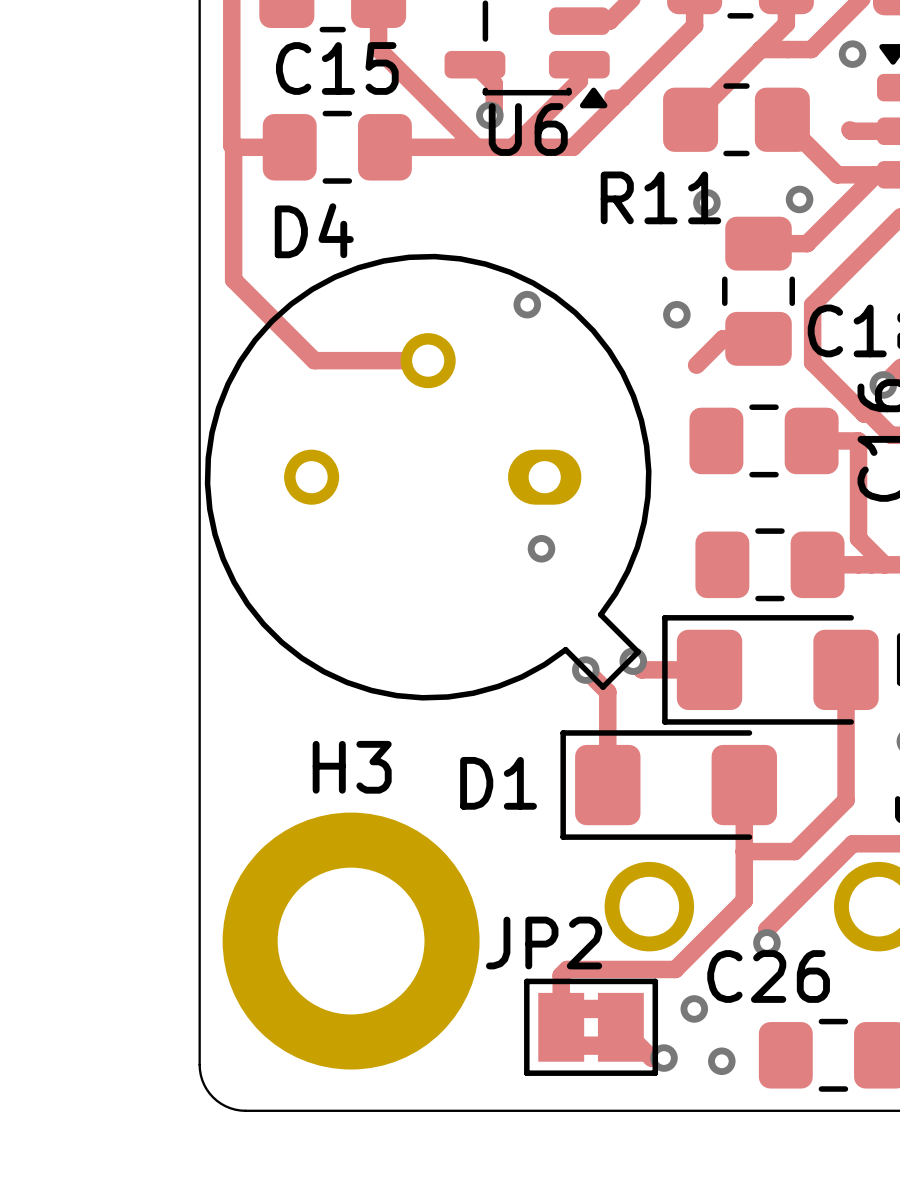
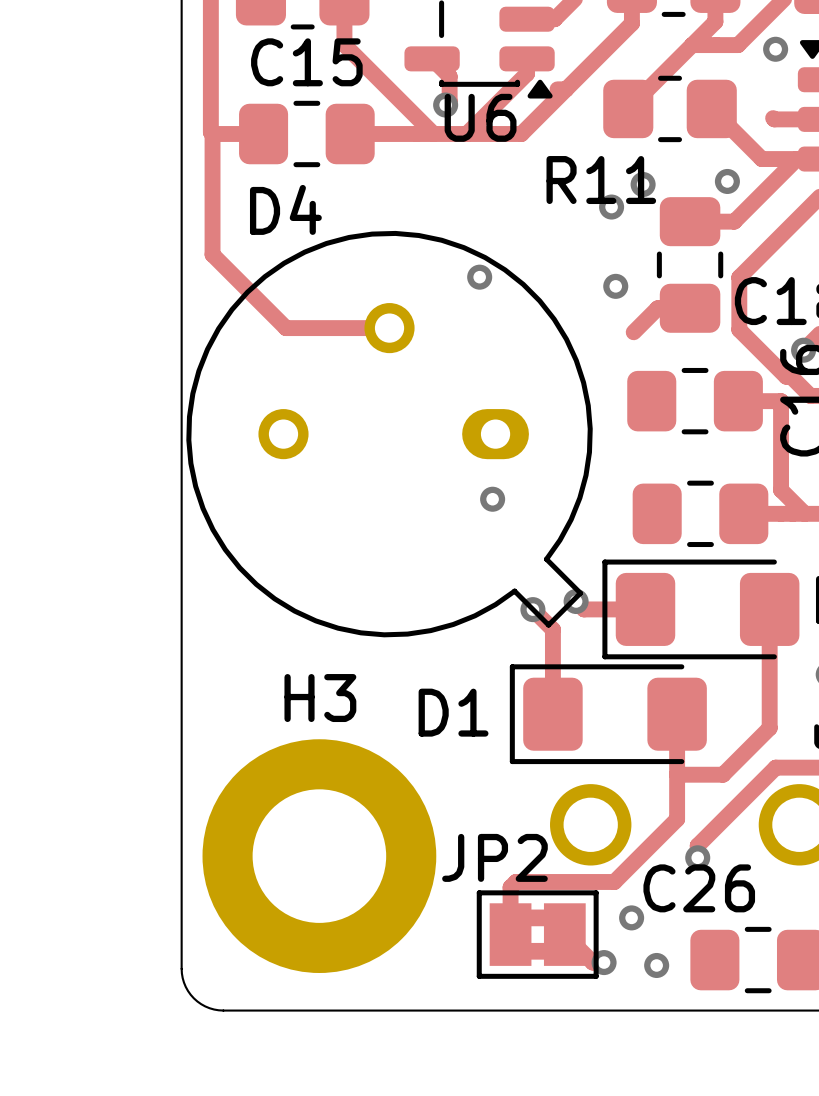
via: none -> (611, 207)

